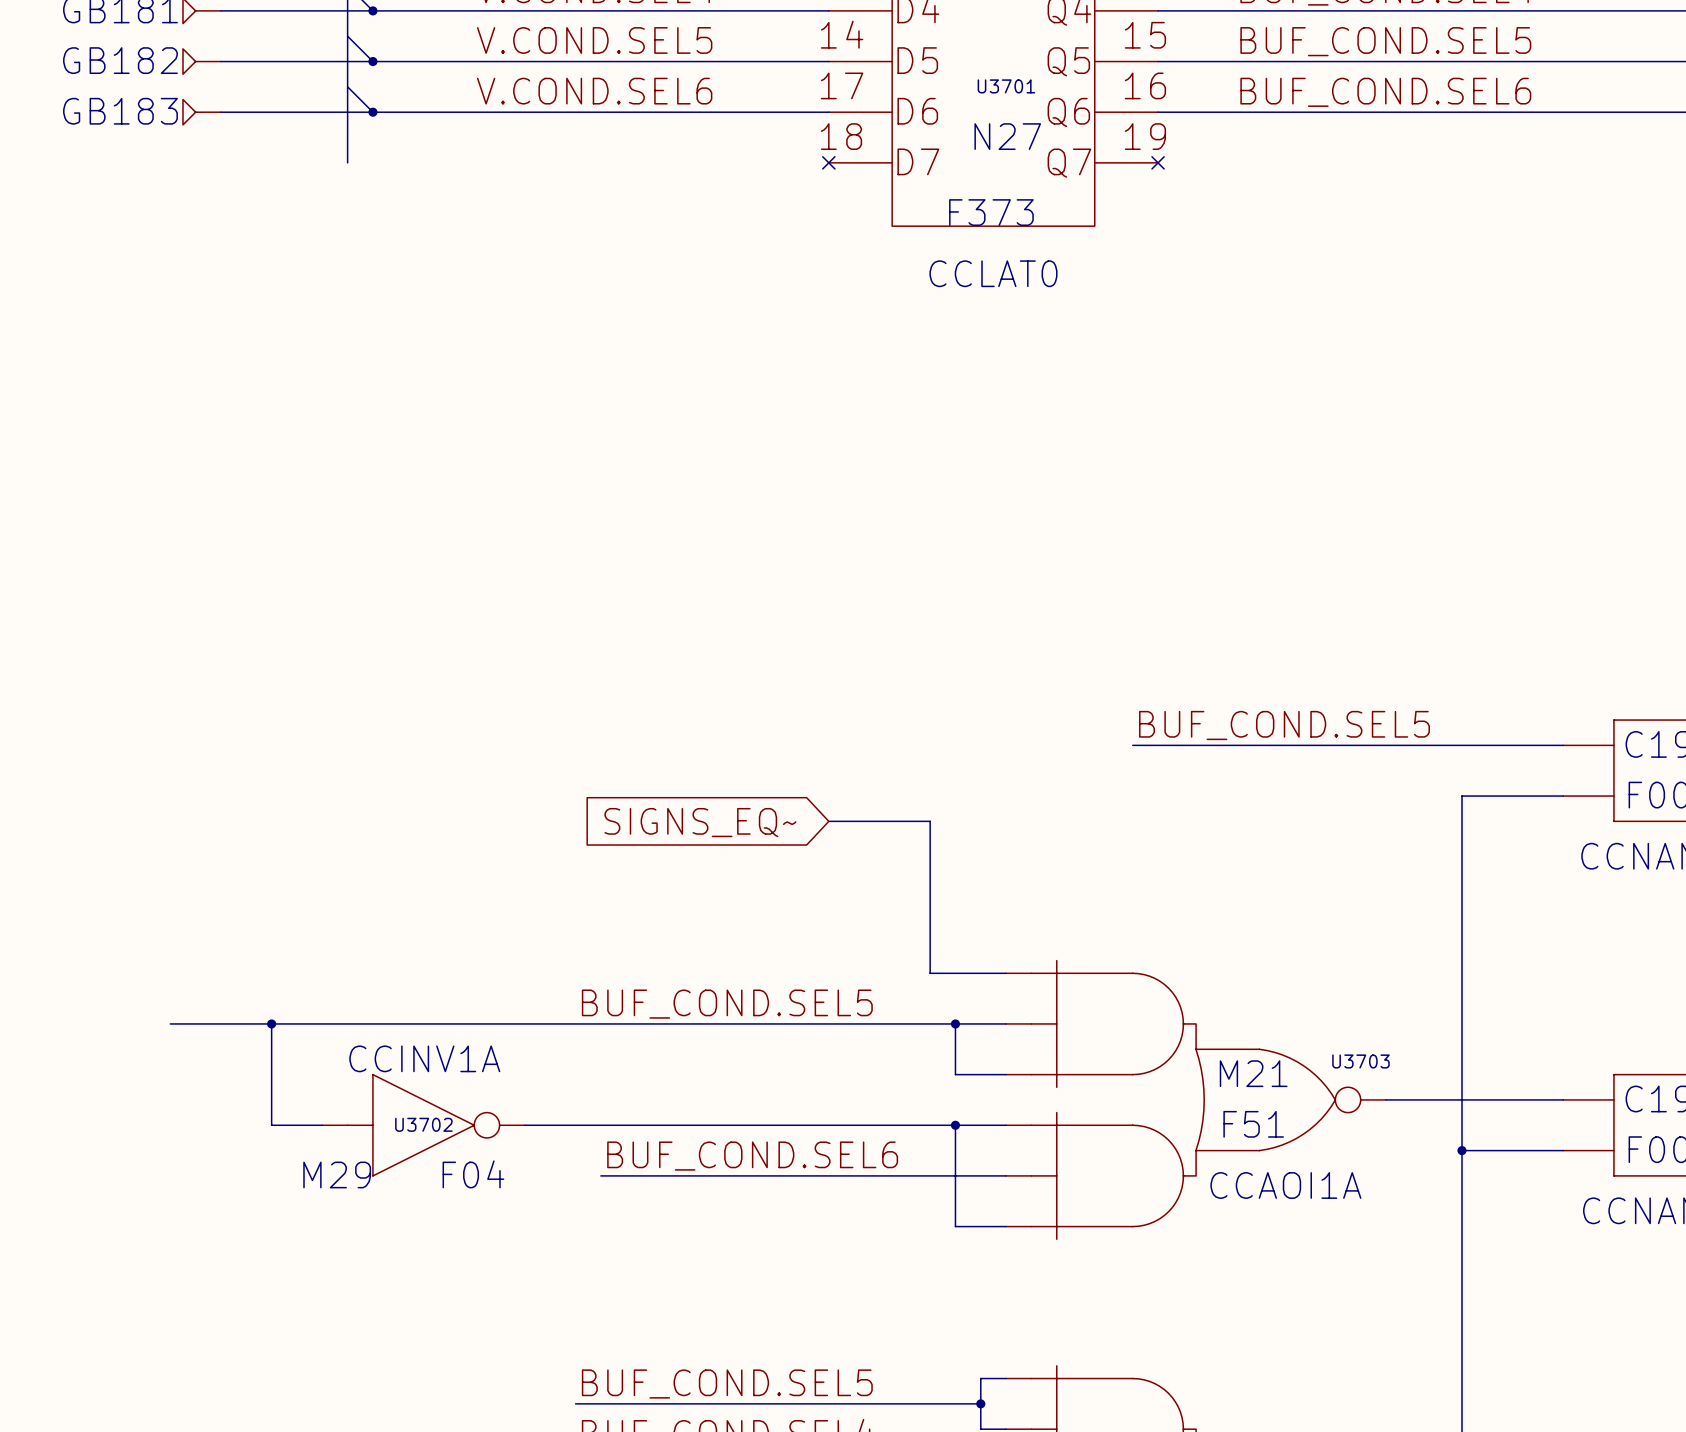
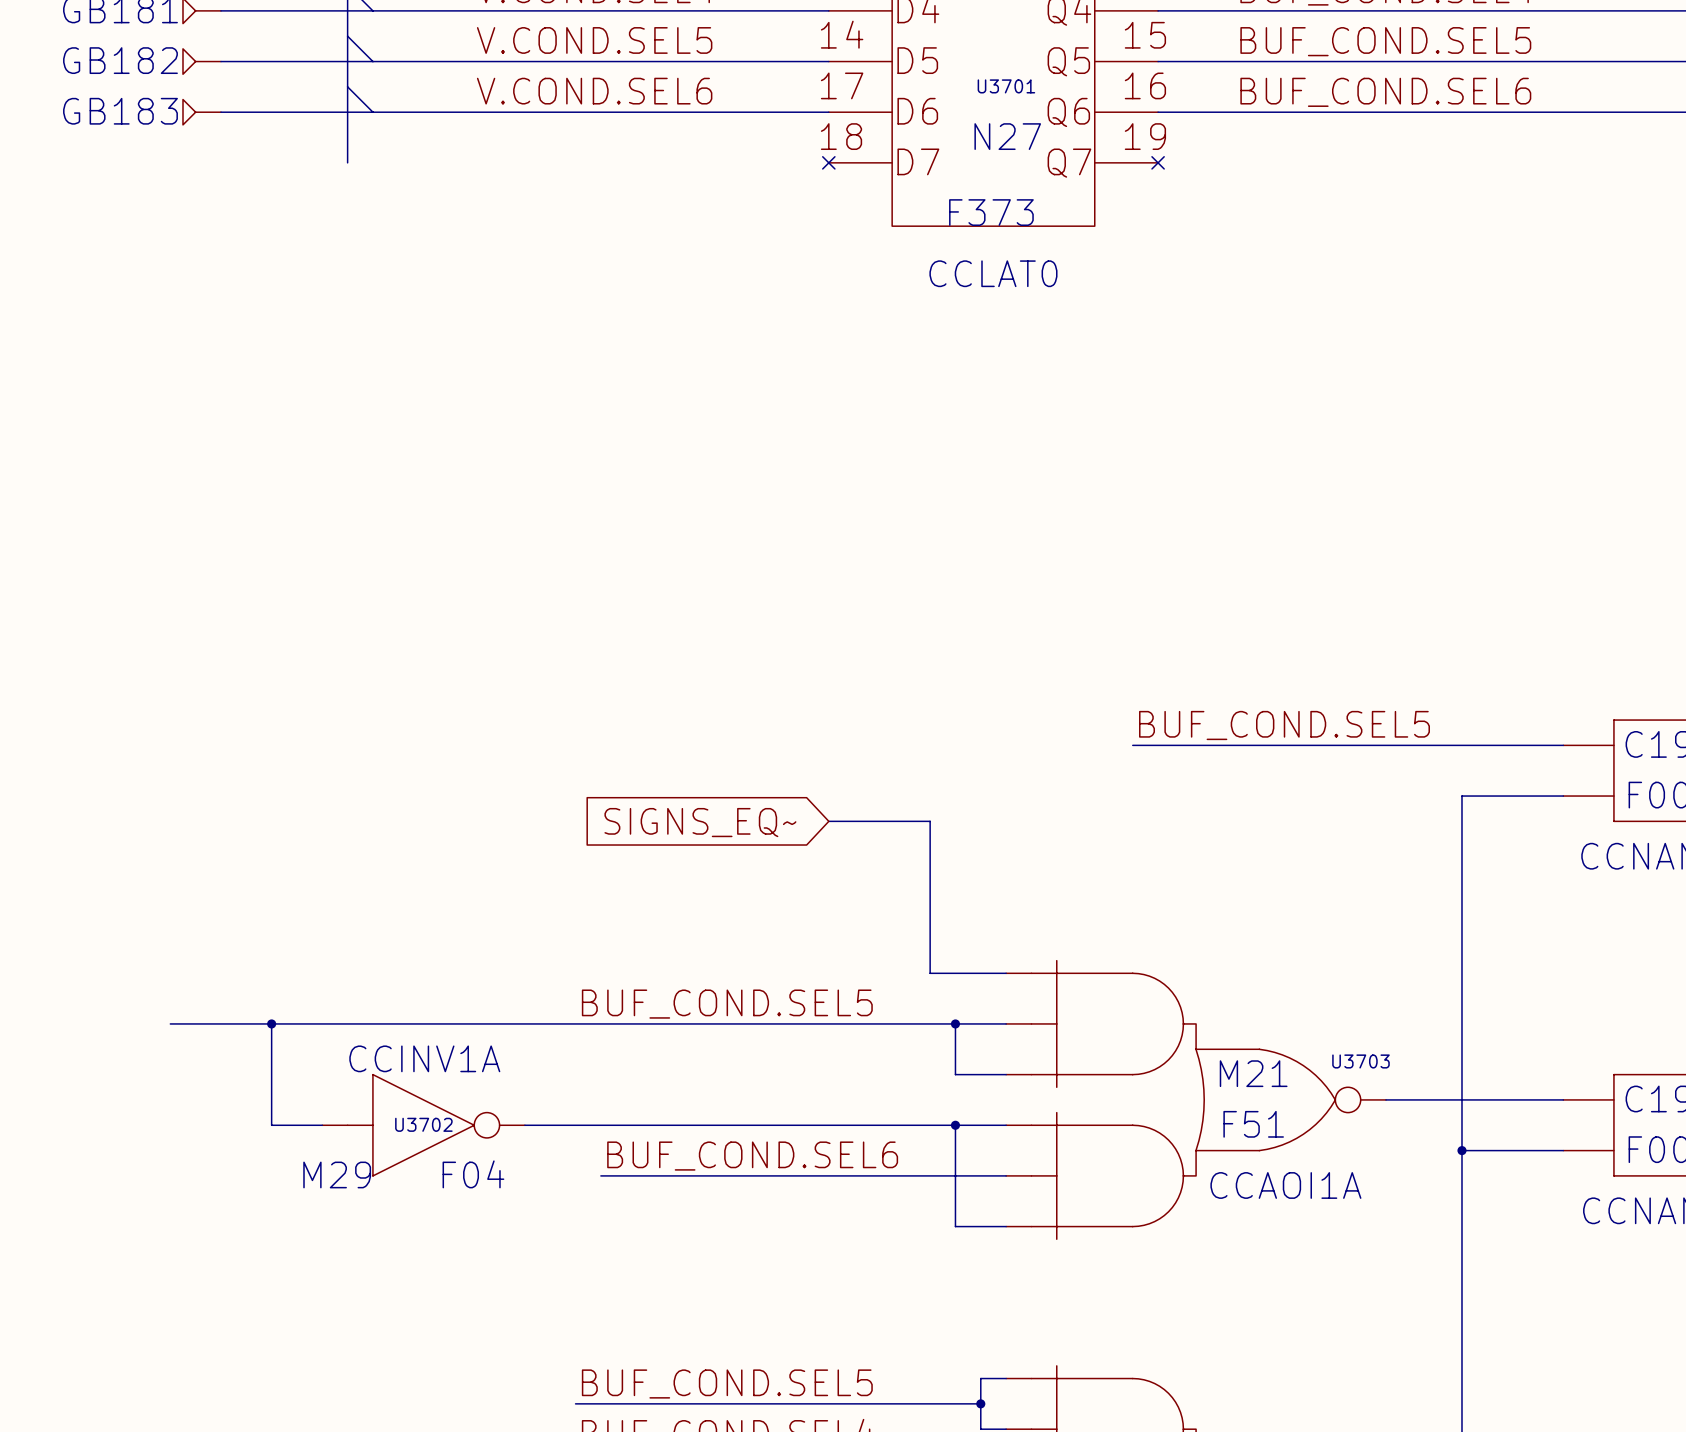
junction: (372, 10) -> none
junction: (372, 61) -> none
junction: (372, 112) -> none

